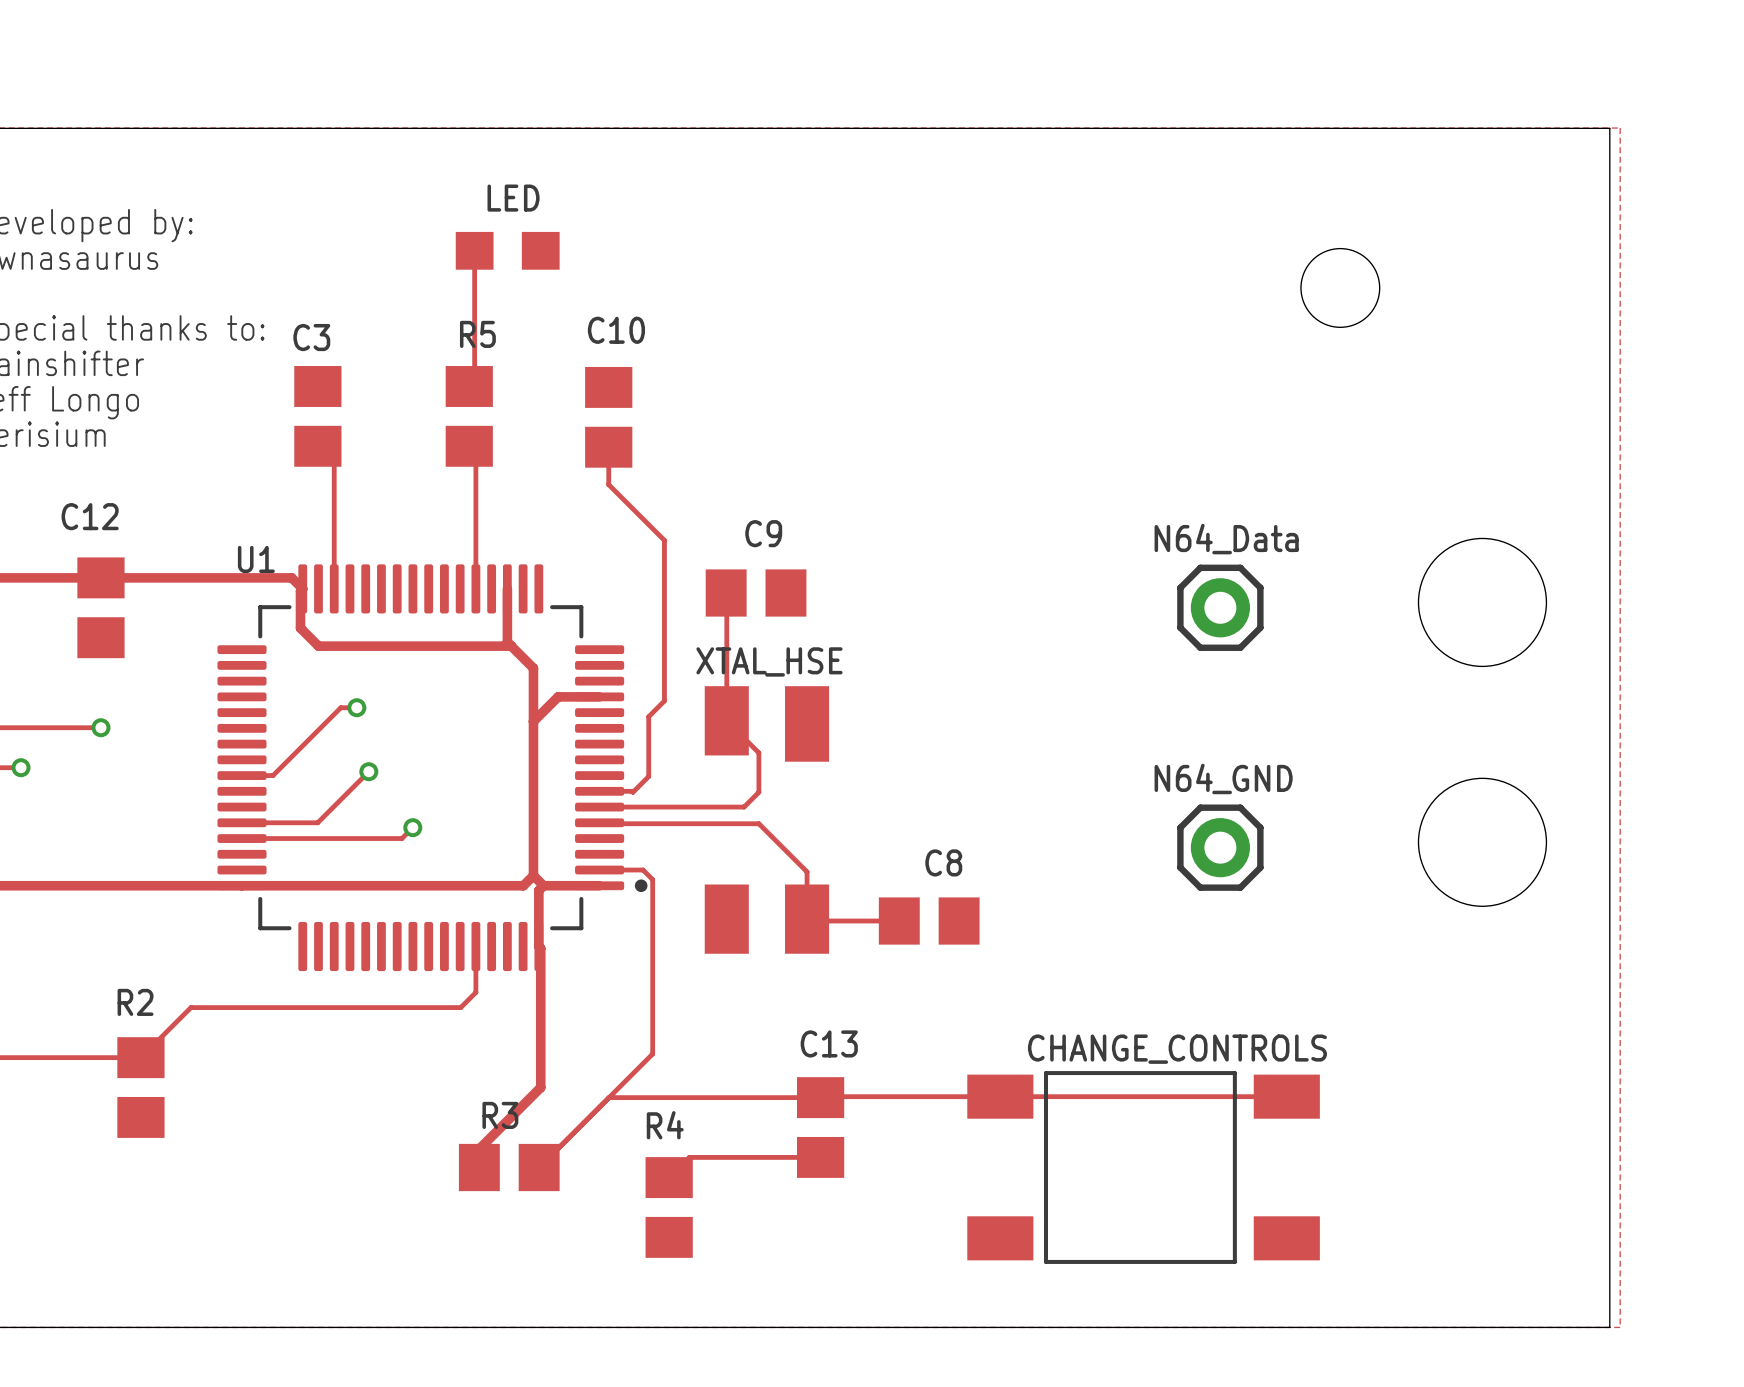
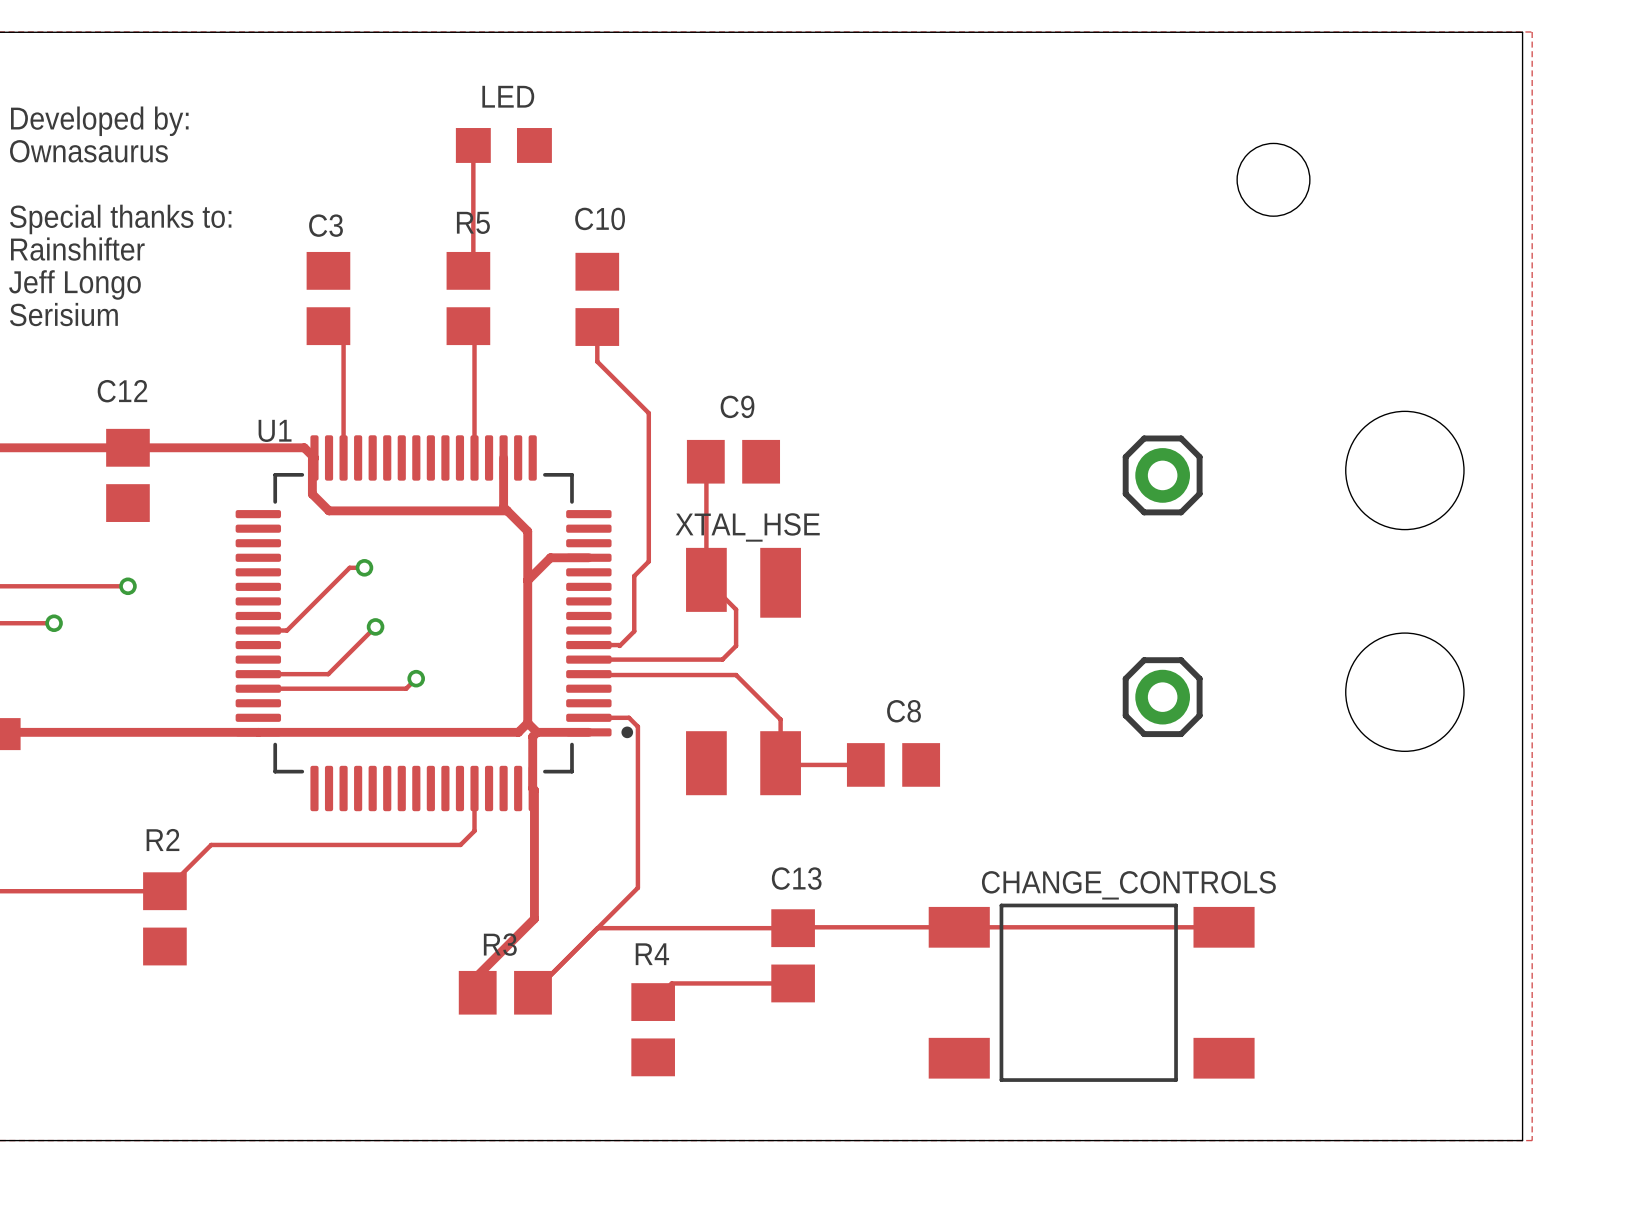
part value: N64_Data (1226, 539) -> none
part value: N64_GND (1223, 778) -> none

